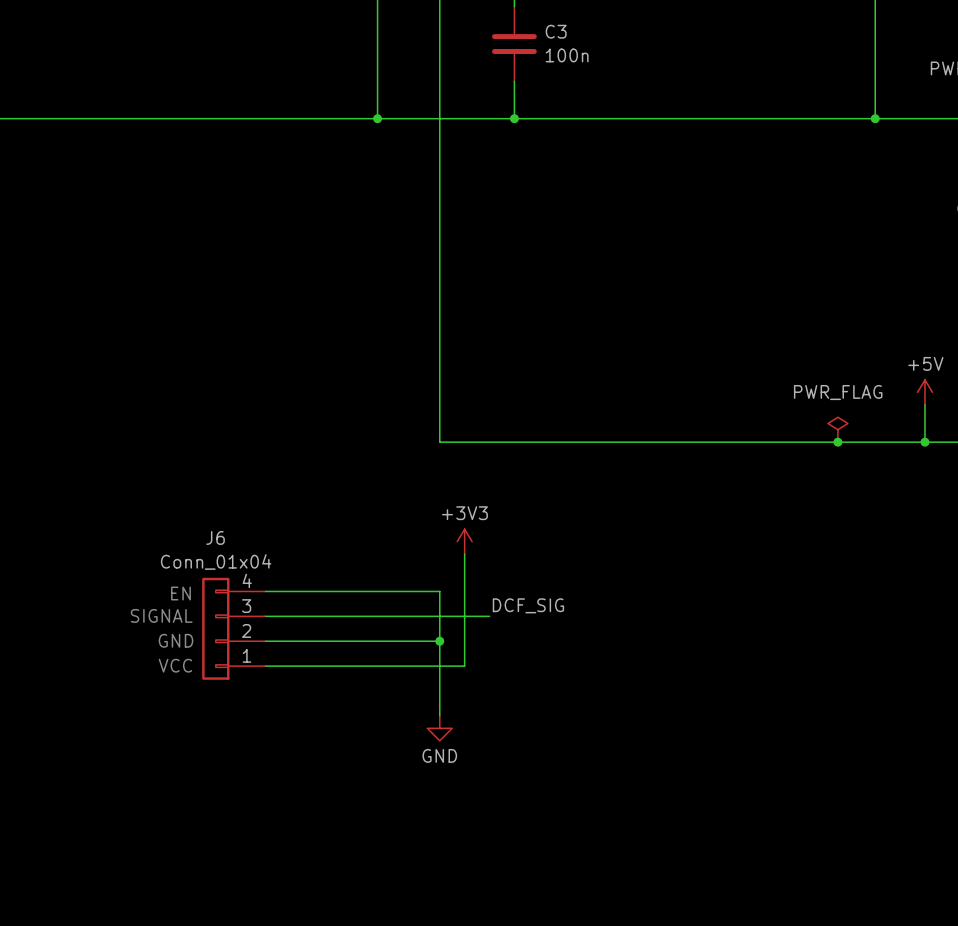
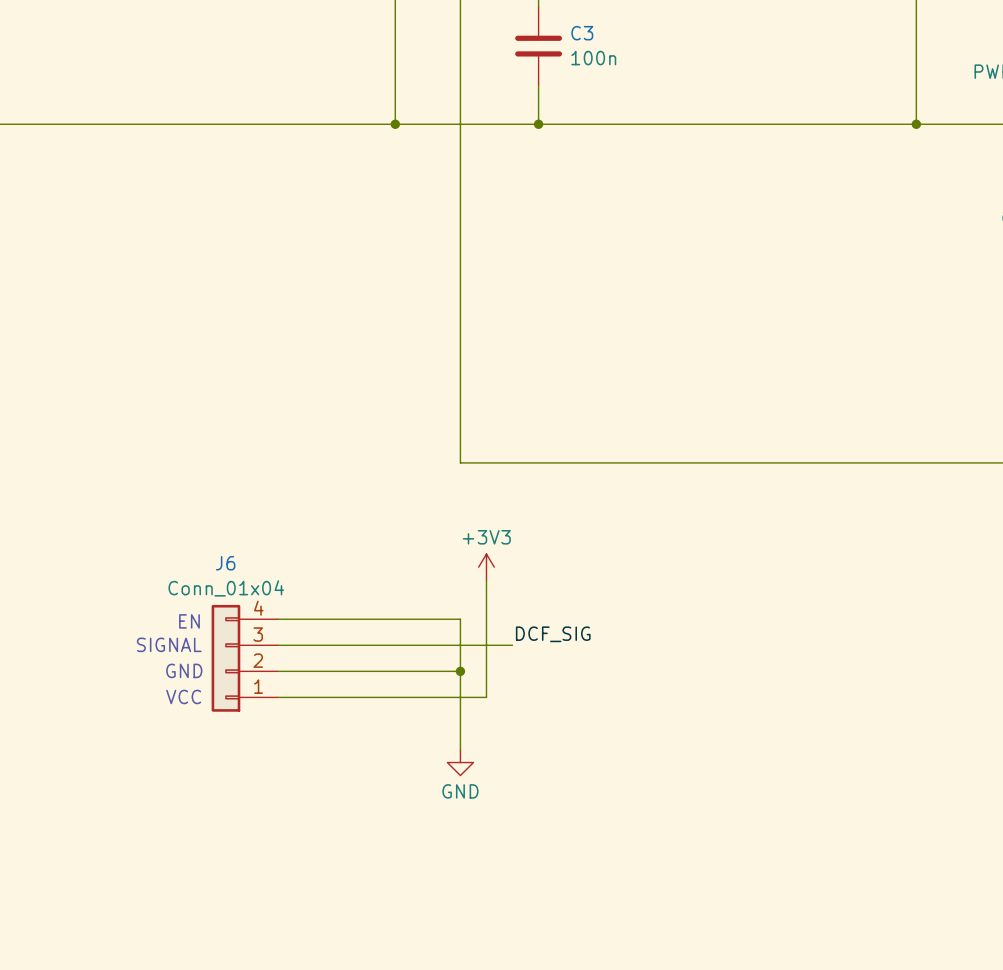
power symbol: +5V (924, 392) -> none
wire: (924, 404) (924, 442) -> none
power symbol: PWR_FLAG (837, 429) -> none
junction: (837, 442) -> none
junction: (924, 442) -> none

